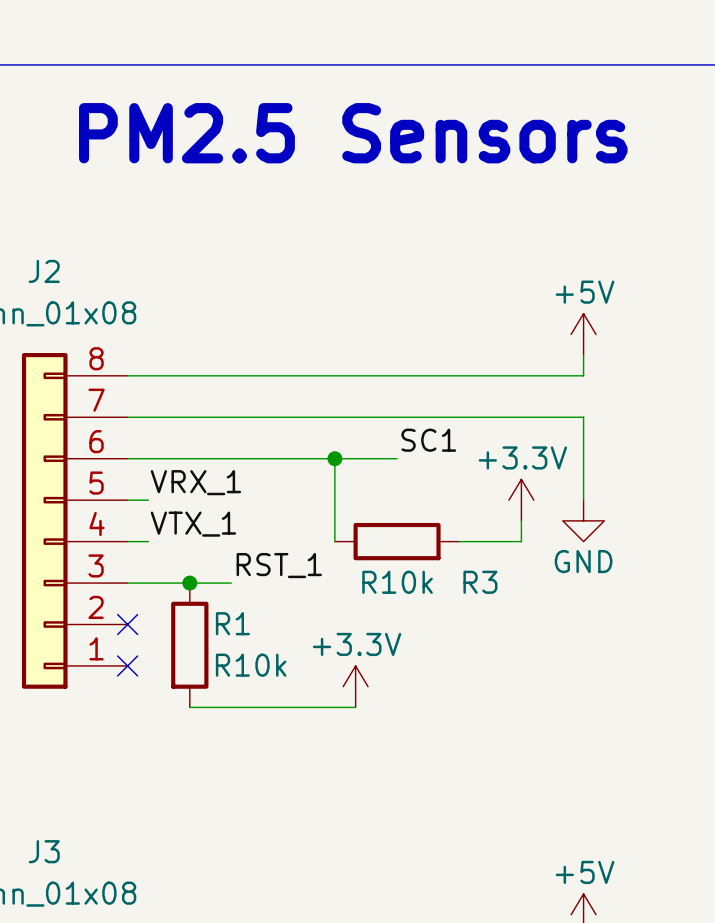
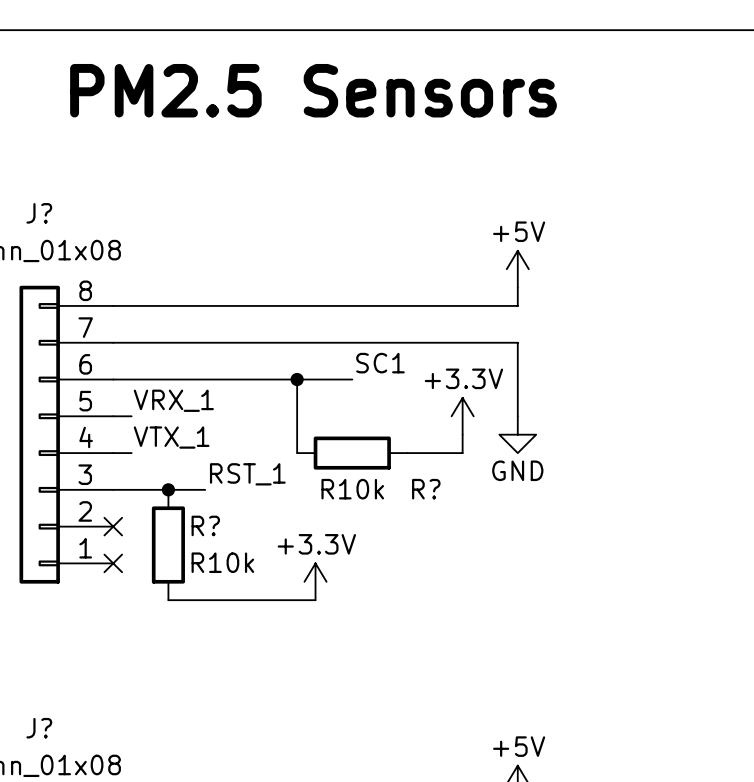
J2 name: J2 (44, 271) -> J? (39, 213)
R3 name: R3 (480, 582) -> R? (426, 489)
R1 name: R1 (232, 623) -> R? (205, 525)
J3 name: J3 (44, 851) -> J? (39, 728)

